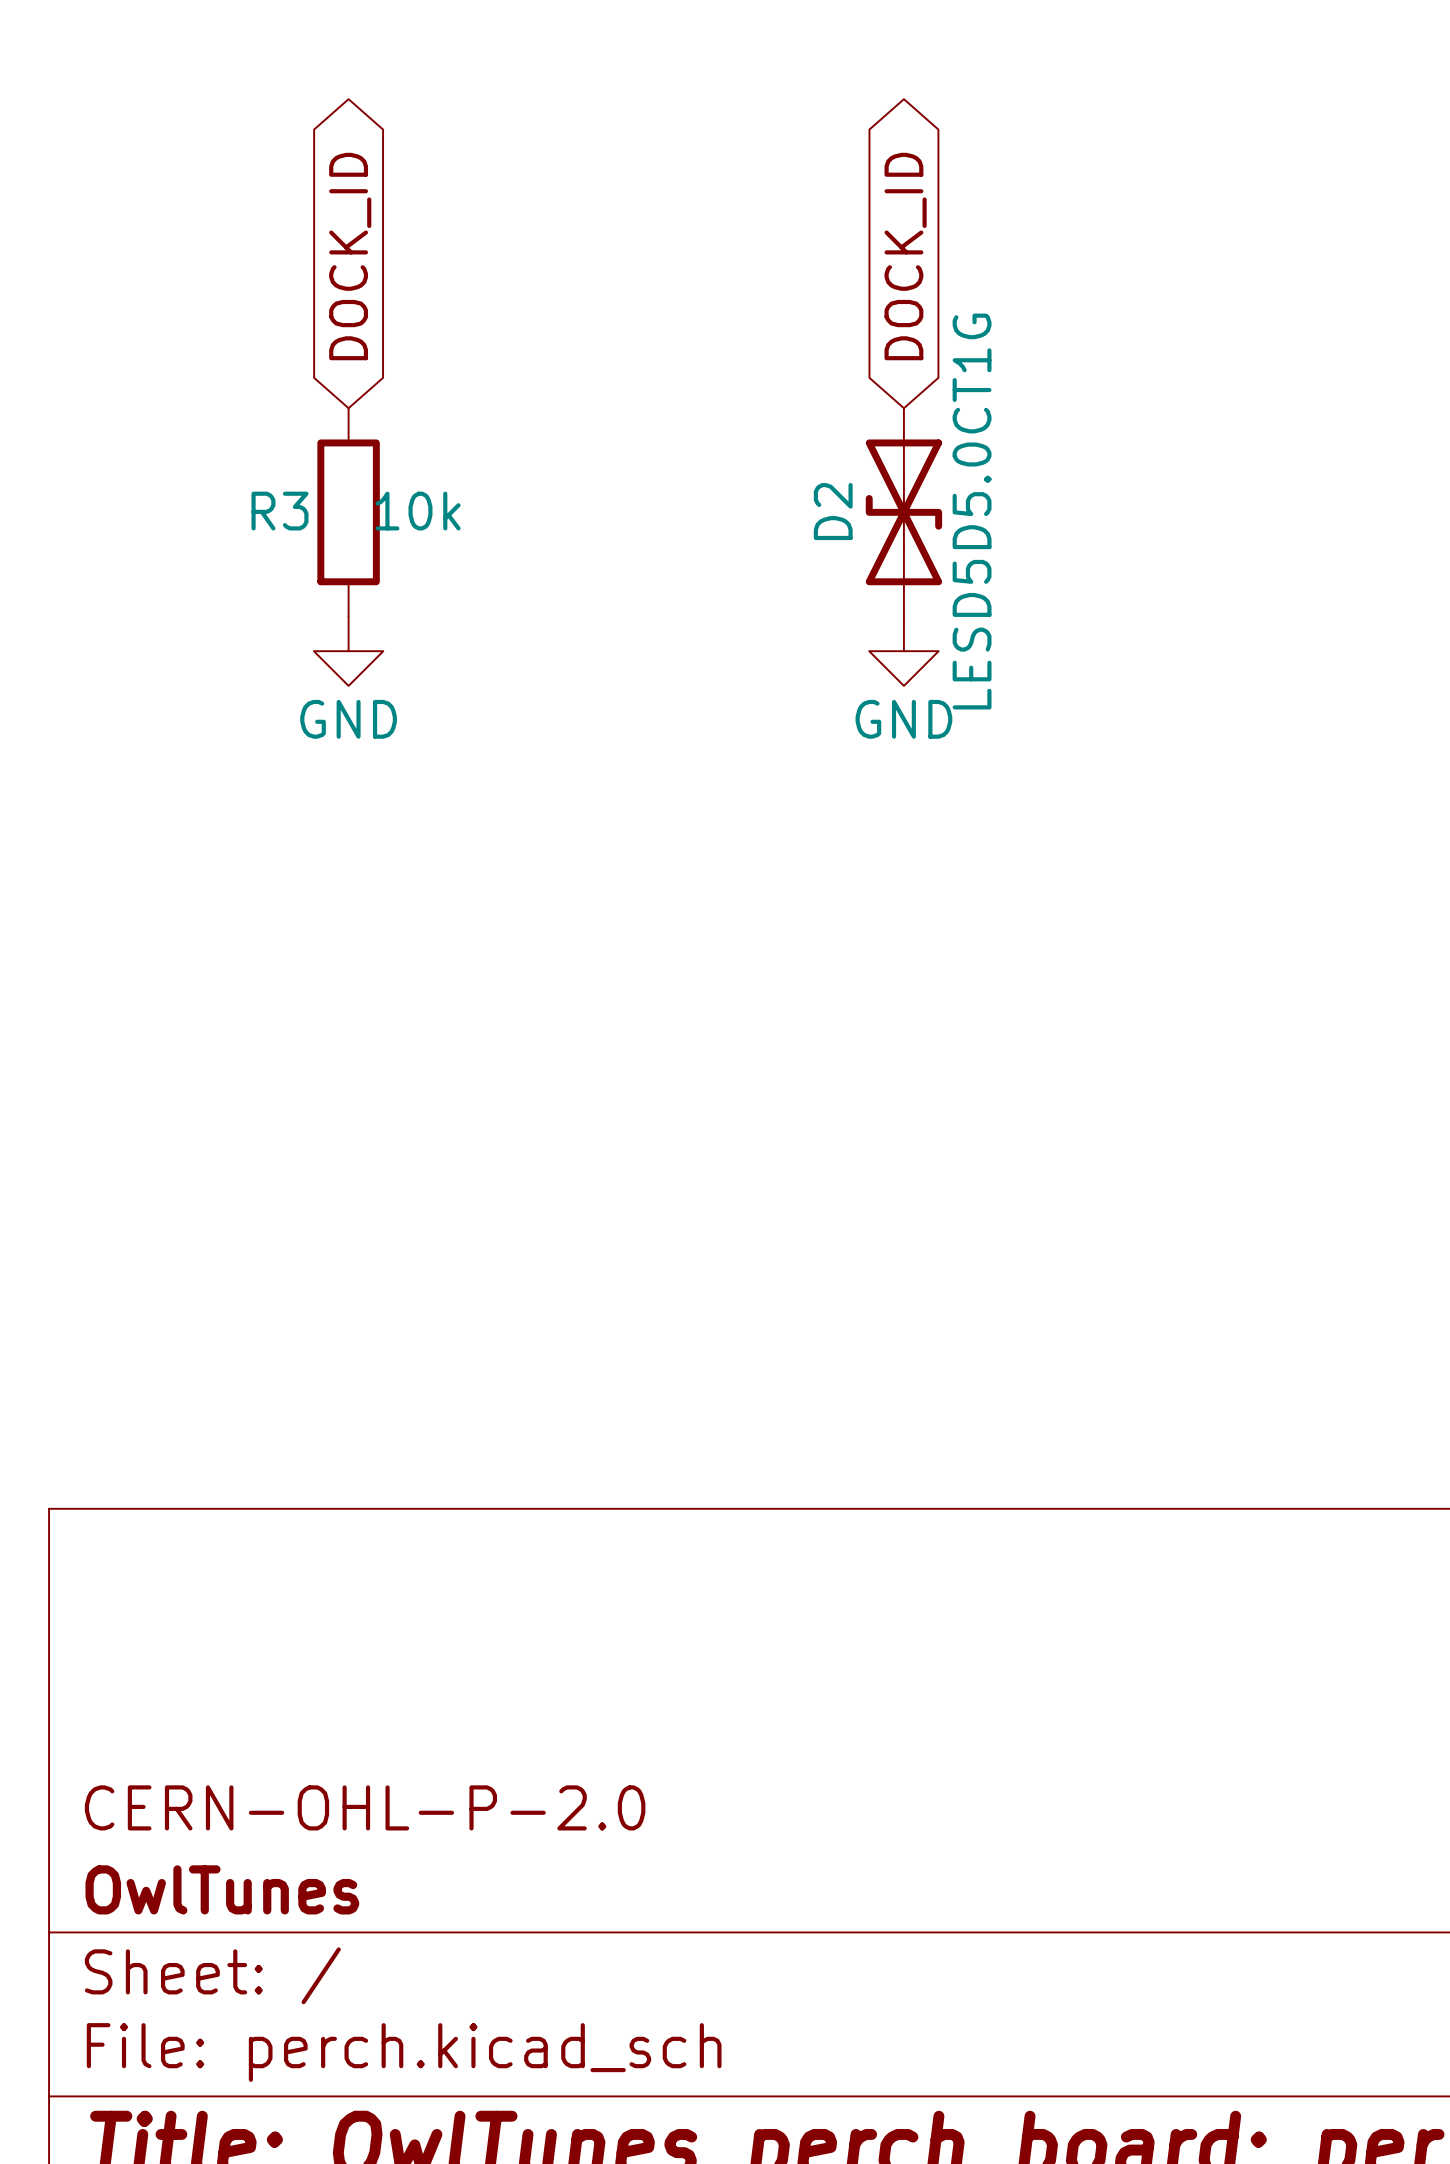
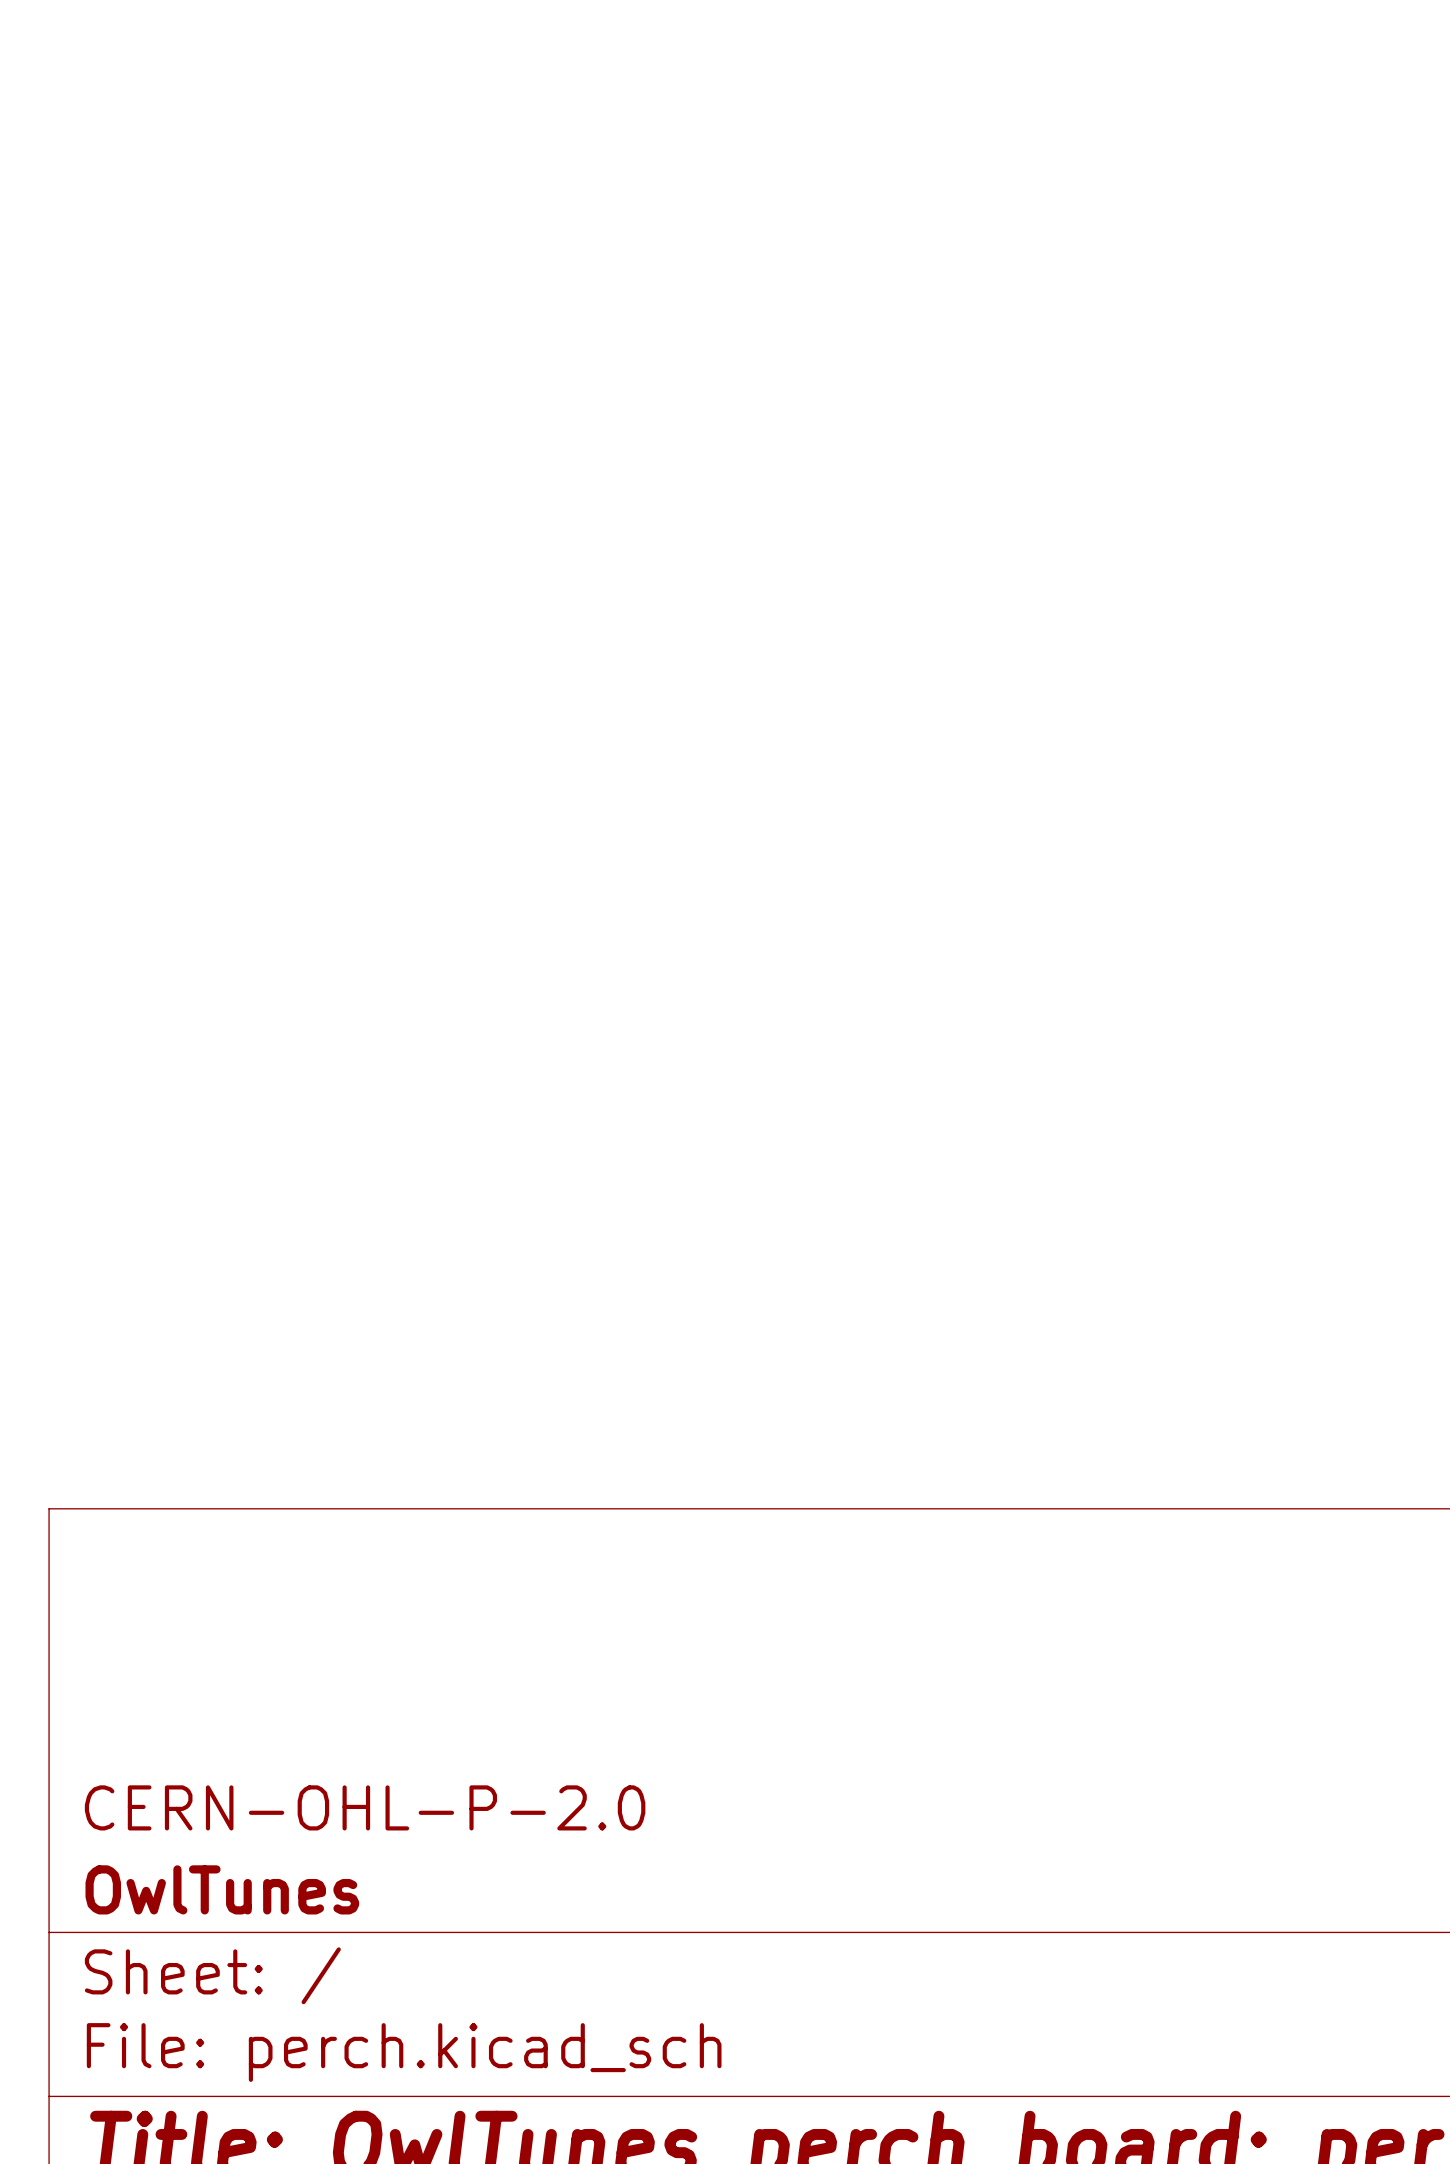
global label: DOCK_ID (350, 256) -> none
global label: DOCK_ID (905, 256) -> none
R3: 10k (348, 512) -> none
D2: LESD5D5.0CT1G (903, 512) -> none
power symbol: GND (348, 651) -> none
power symbol: GND (903, 651) -> none

